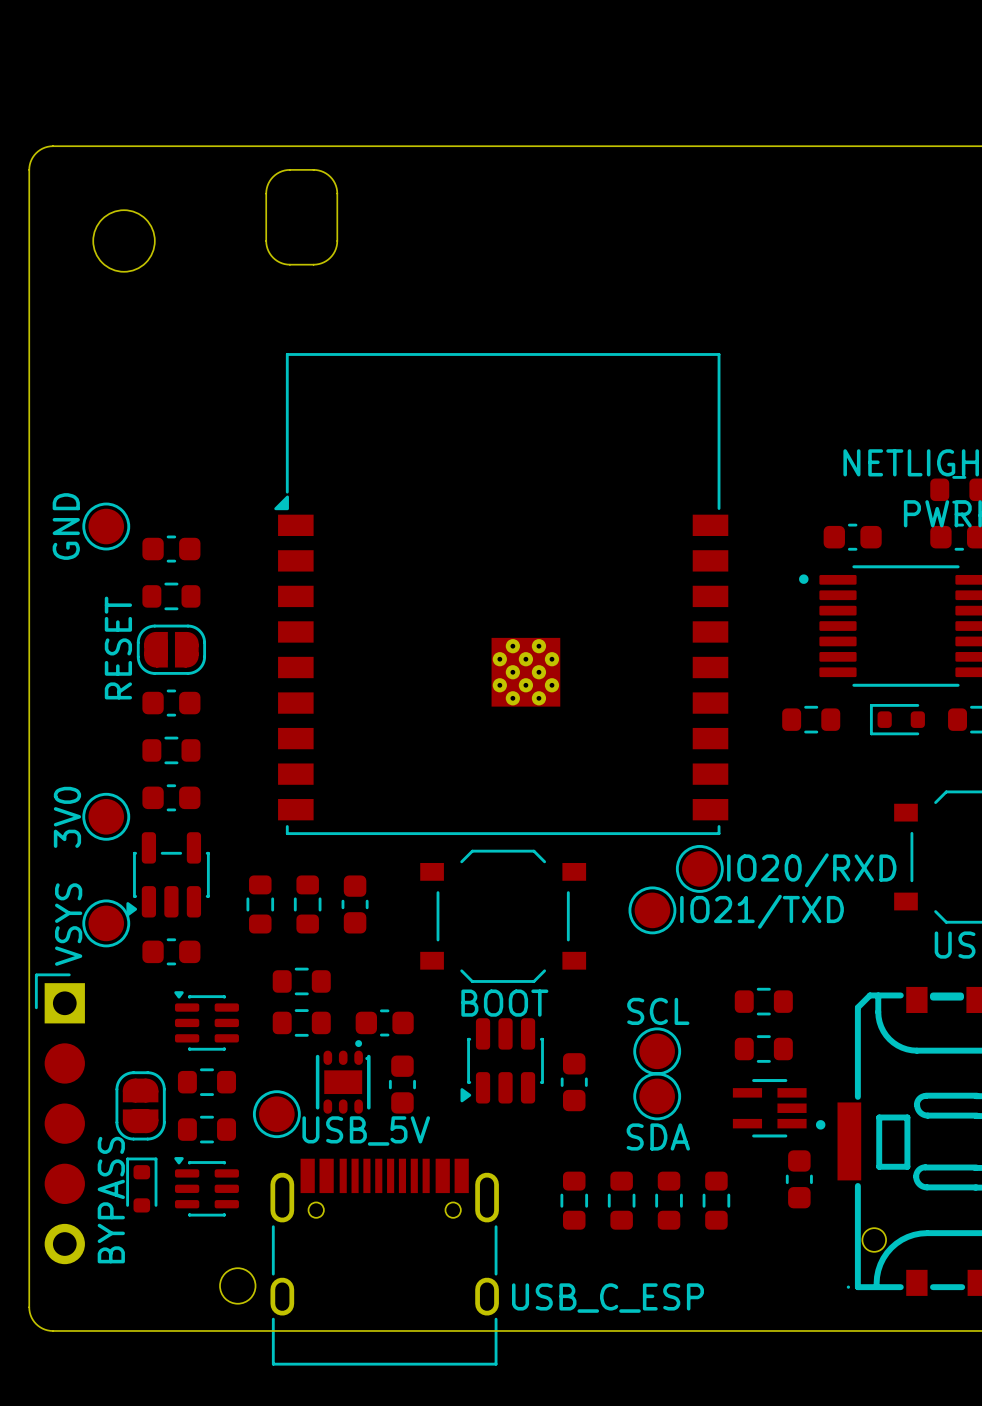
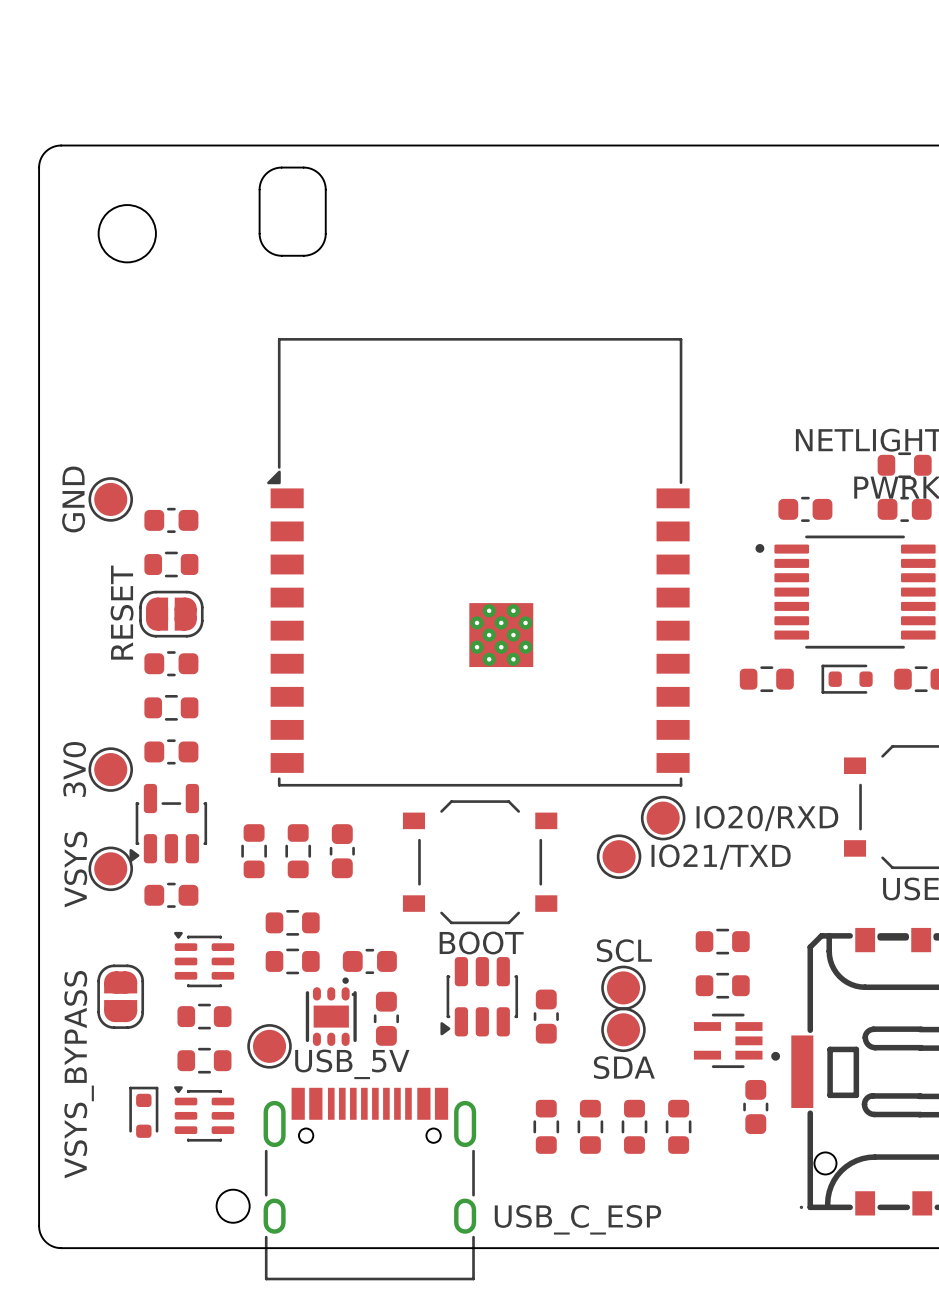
part: none -> VSYS_BYPASS (120, 996)
part: BYPASS (140, 1105) -> none
part: (59, 1118) -> none

